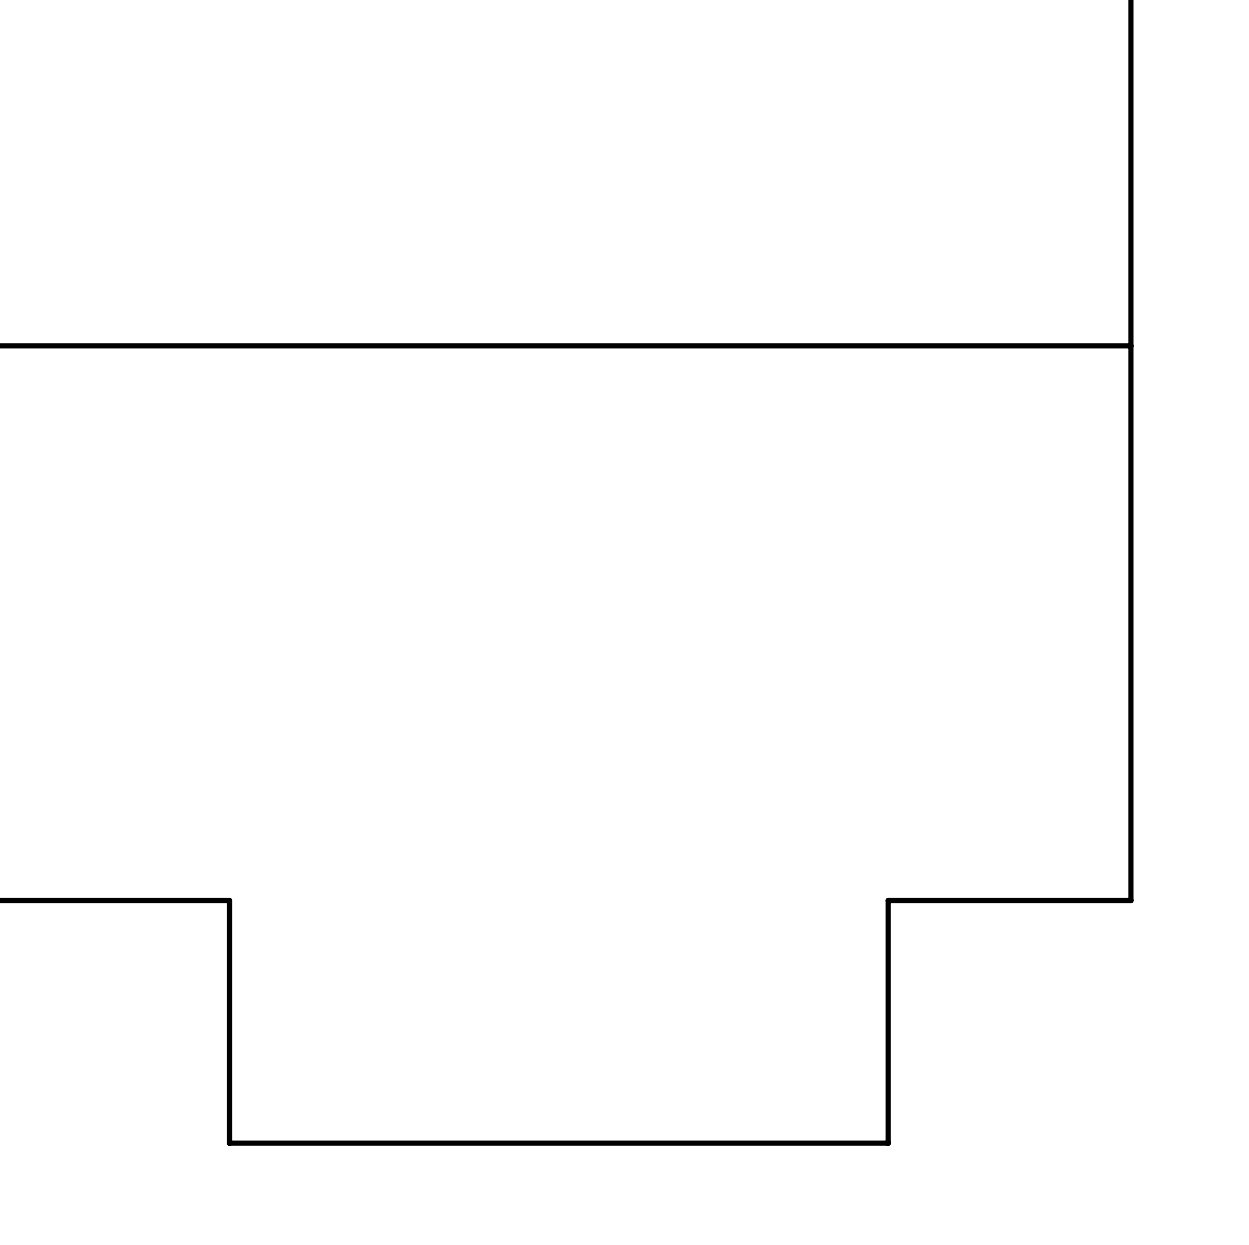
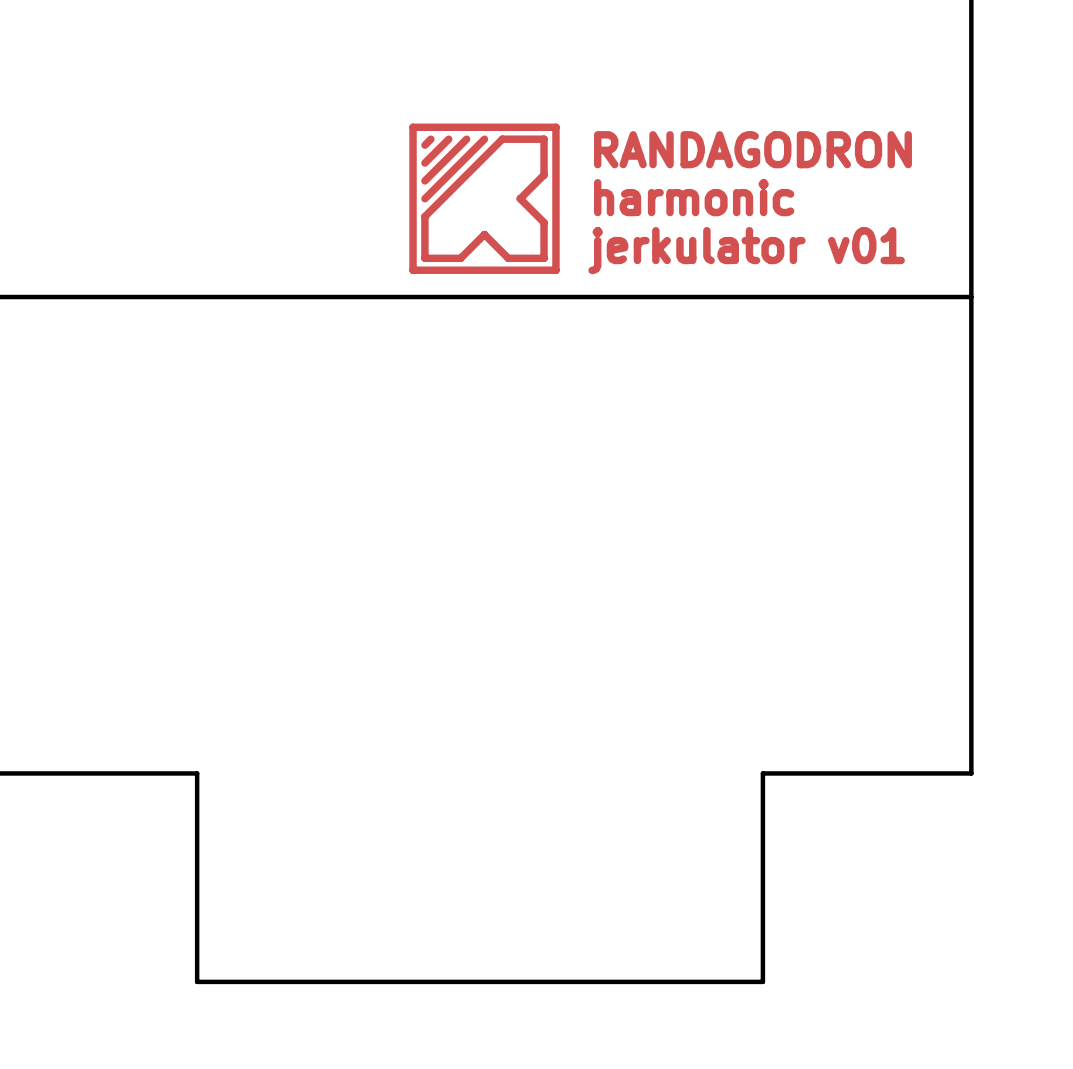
track: none -> (413, 127) (413, 270) (555, 270) (555, 127) (413, 127)
track: none -> (430, 139) (424, 145)
track: none -> (448, 139) (424, 163)
track: none -> (466, 139) (424, 180)
track: none -> (484, 139) (424, 198)
track: none -> (502, 139) (424, 216) (424, 258) (460, 258) (484, 234) (508, 258) (544, 258) (544, 222) (520, 198) (544, 174) (544, 139) (502, 139)
text: none -> RANDAGODRON (752, 149)
text: none -> harmonic (694, 197)
text: none -> jerkulator v01 (746, 250)

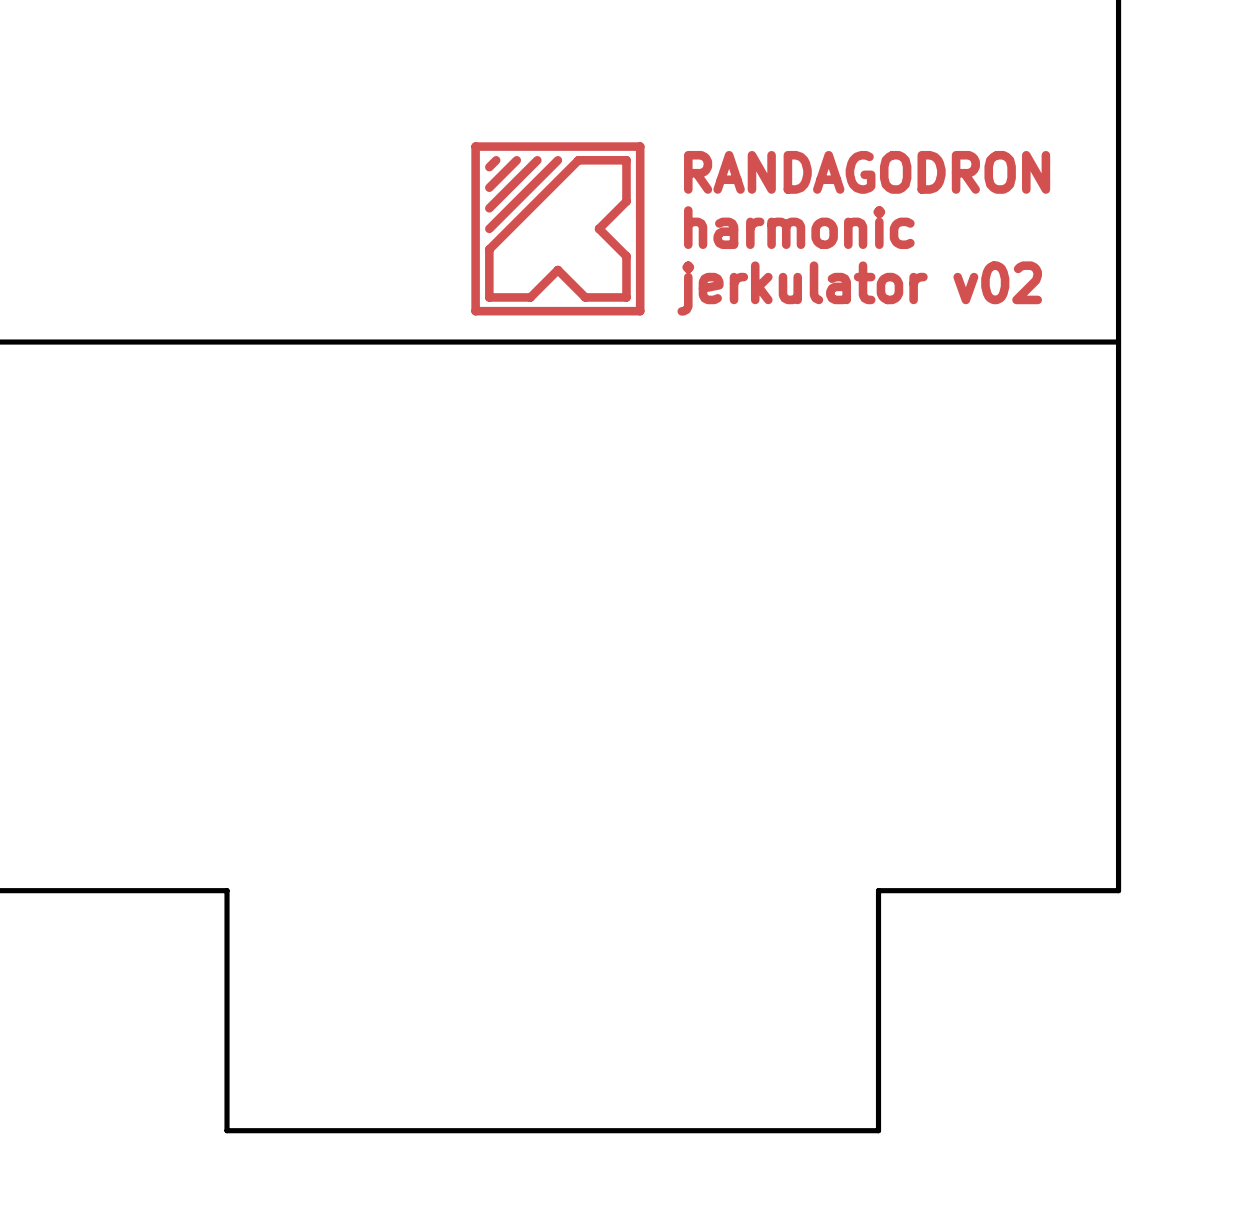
text: jerkulator v01 (746, 250) -> jerkulator v02 (859, 288)

